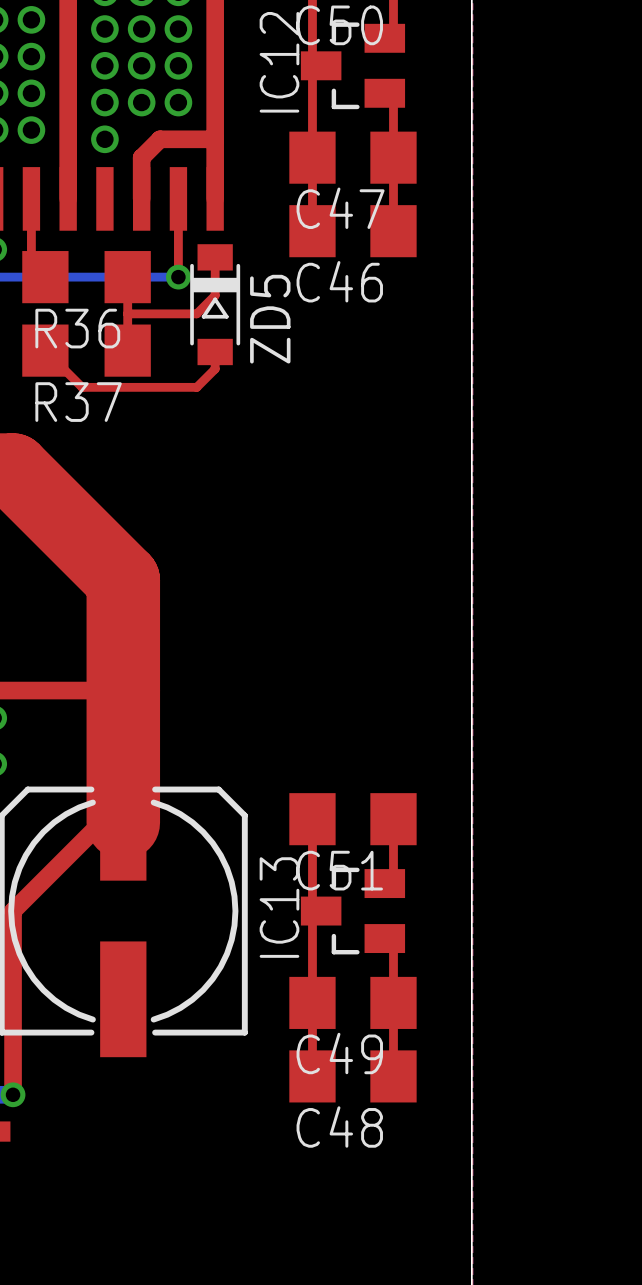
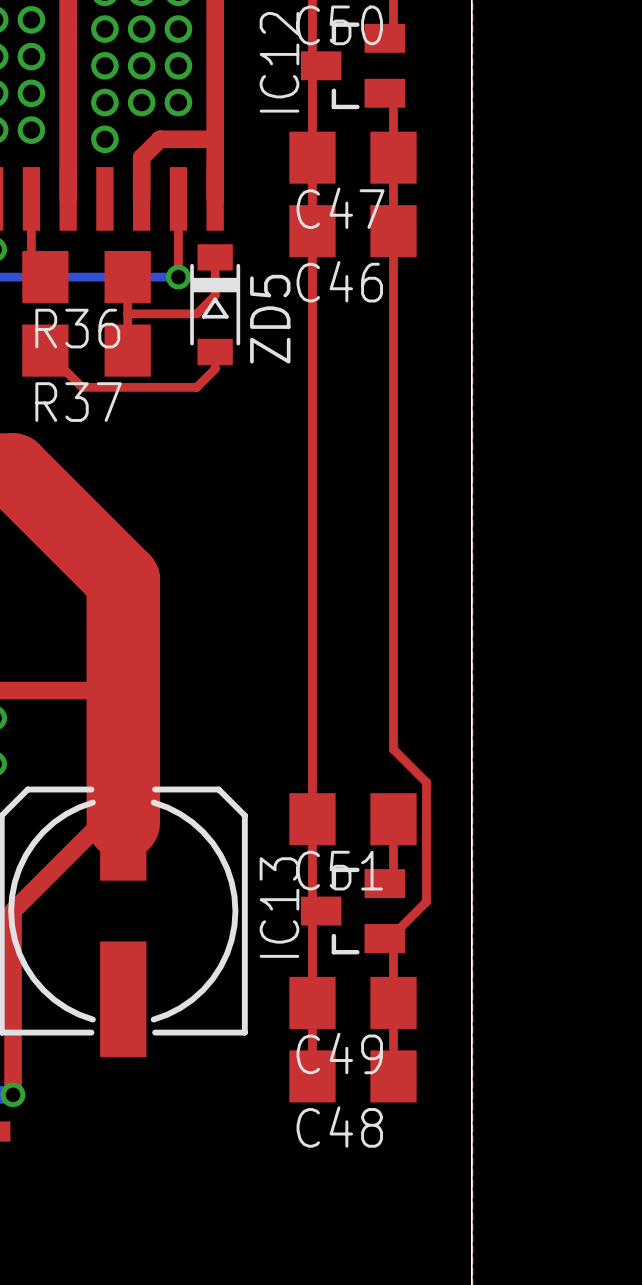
top track: none -> (312, 231) (312, 819)
top track: none -> (393, 231) (393, 749) (426, 782) (426, 901) (389, 938) (384, 938)

